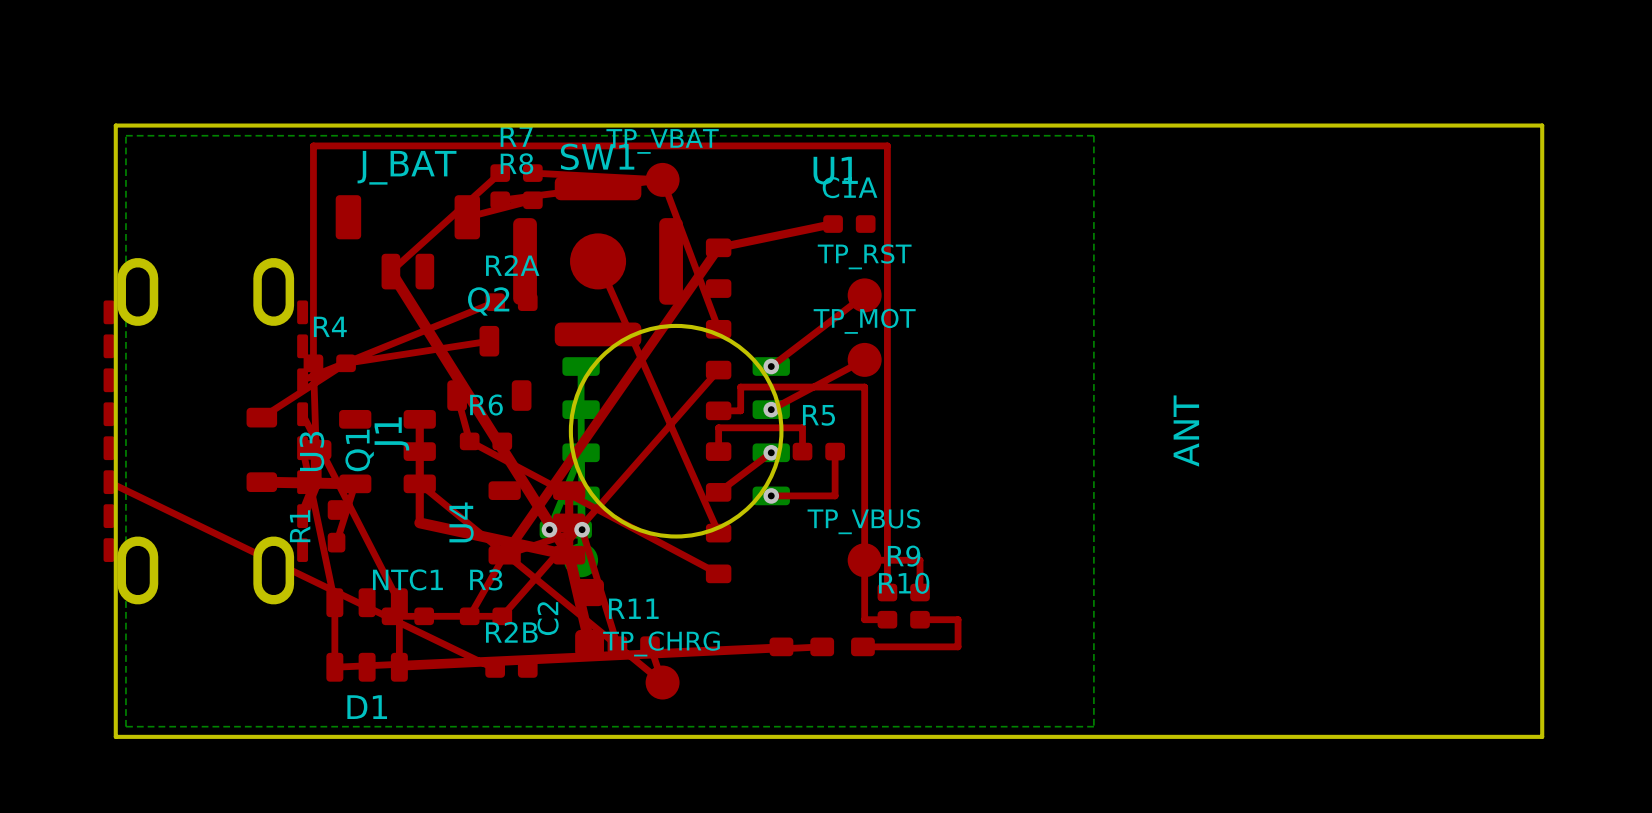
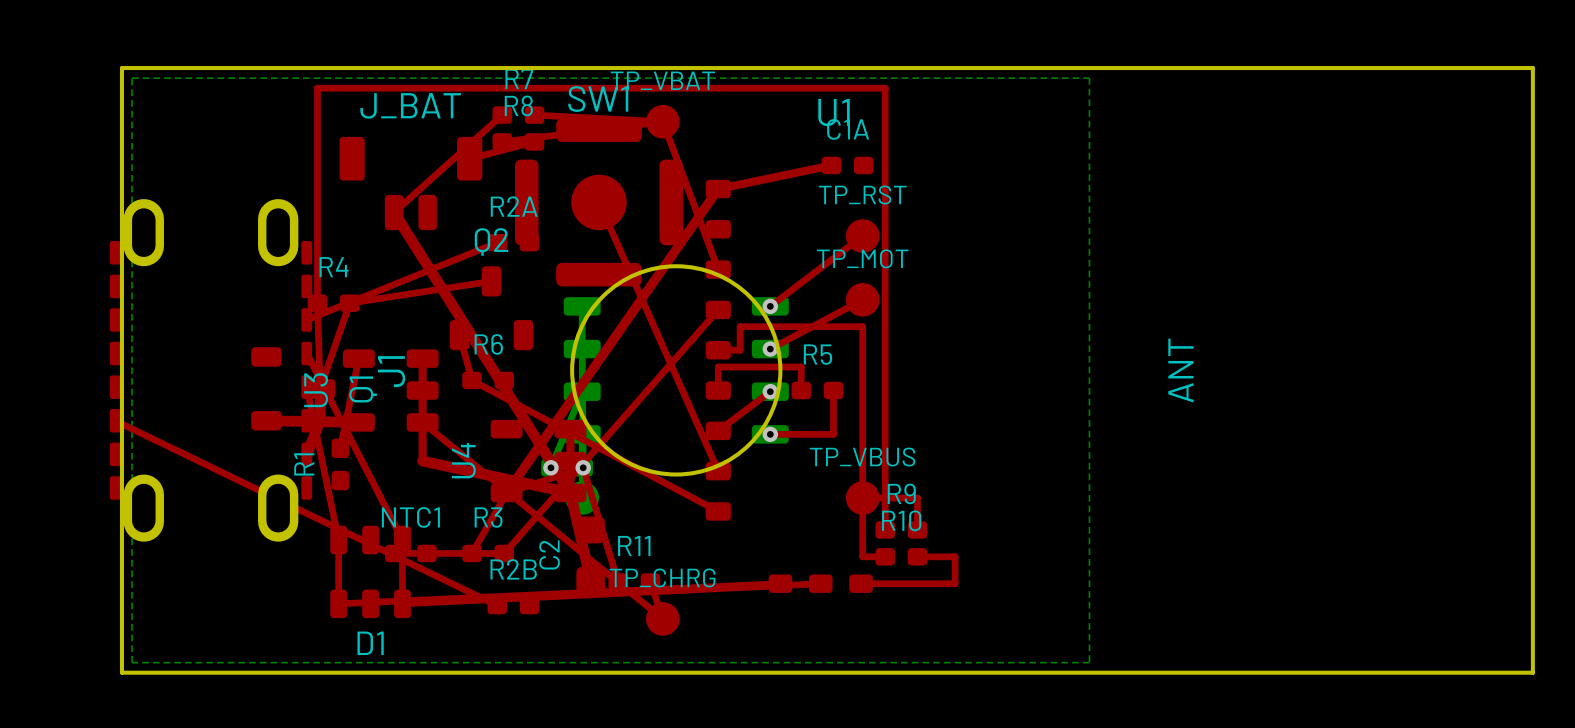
top track: (346, 363) (261, 417) -> (349, 303) (320, 388)
top track: none -> (358, 358) (340, 448)
top track: (355, 483) (336, 542) -> none

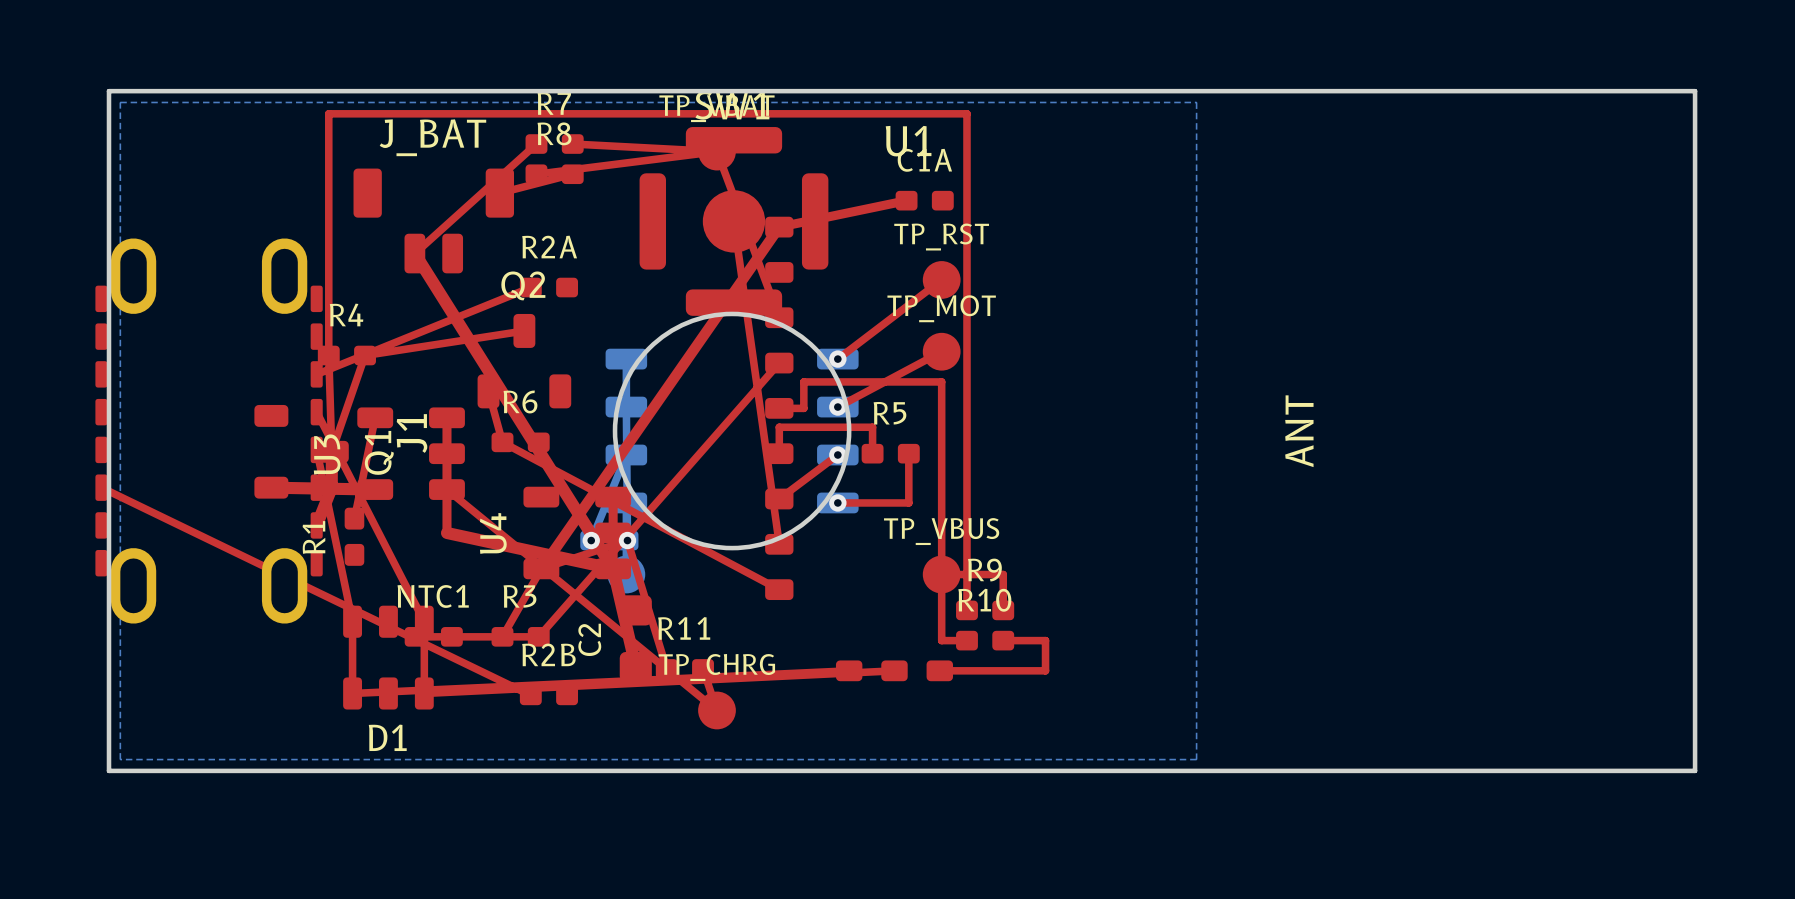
top track: (599, 202) (718, 471) -> (733, 221) (779, 544)
SW1 position: (599, 202) -> (733, 221)

